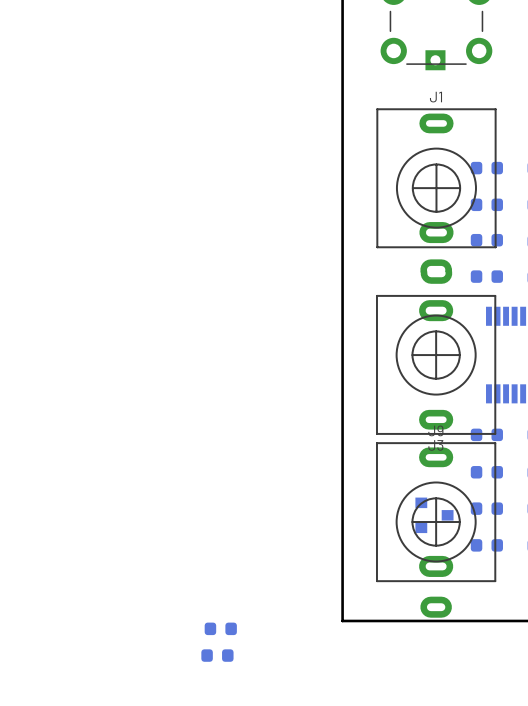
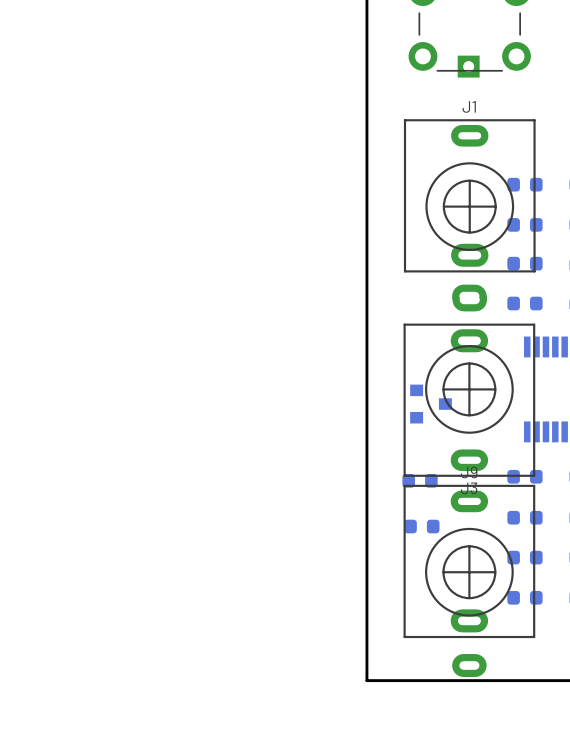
part: none -> (420, 480)
part: none -> (421, 526)
part position: (434, 515) -> (431, 404)
part: (220, 628) -> none
part: (217, 655) -> none

